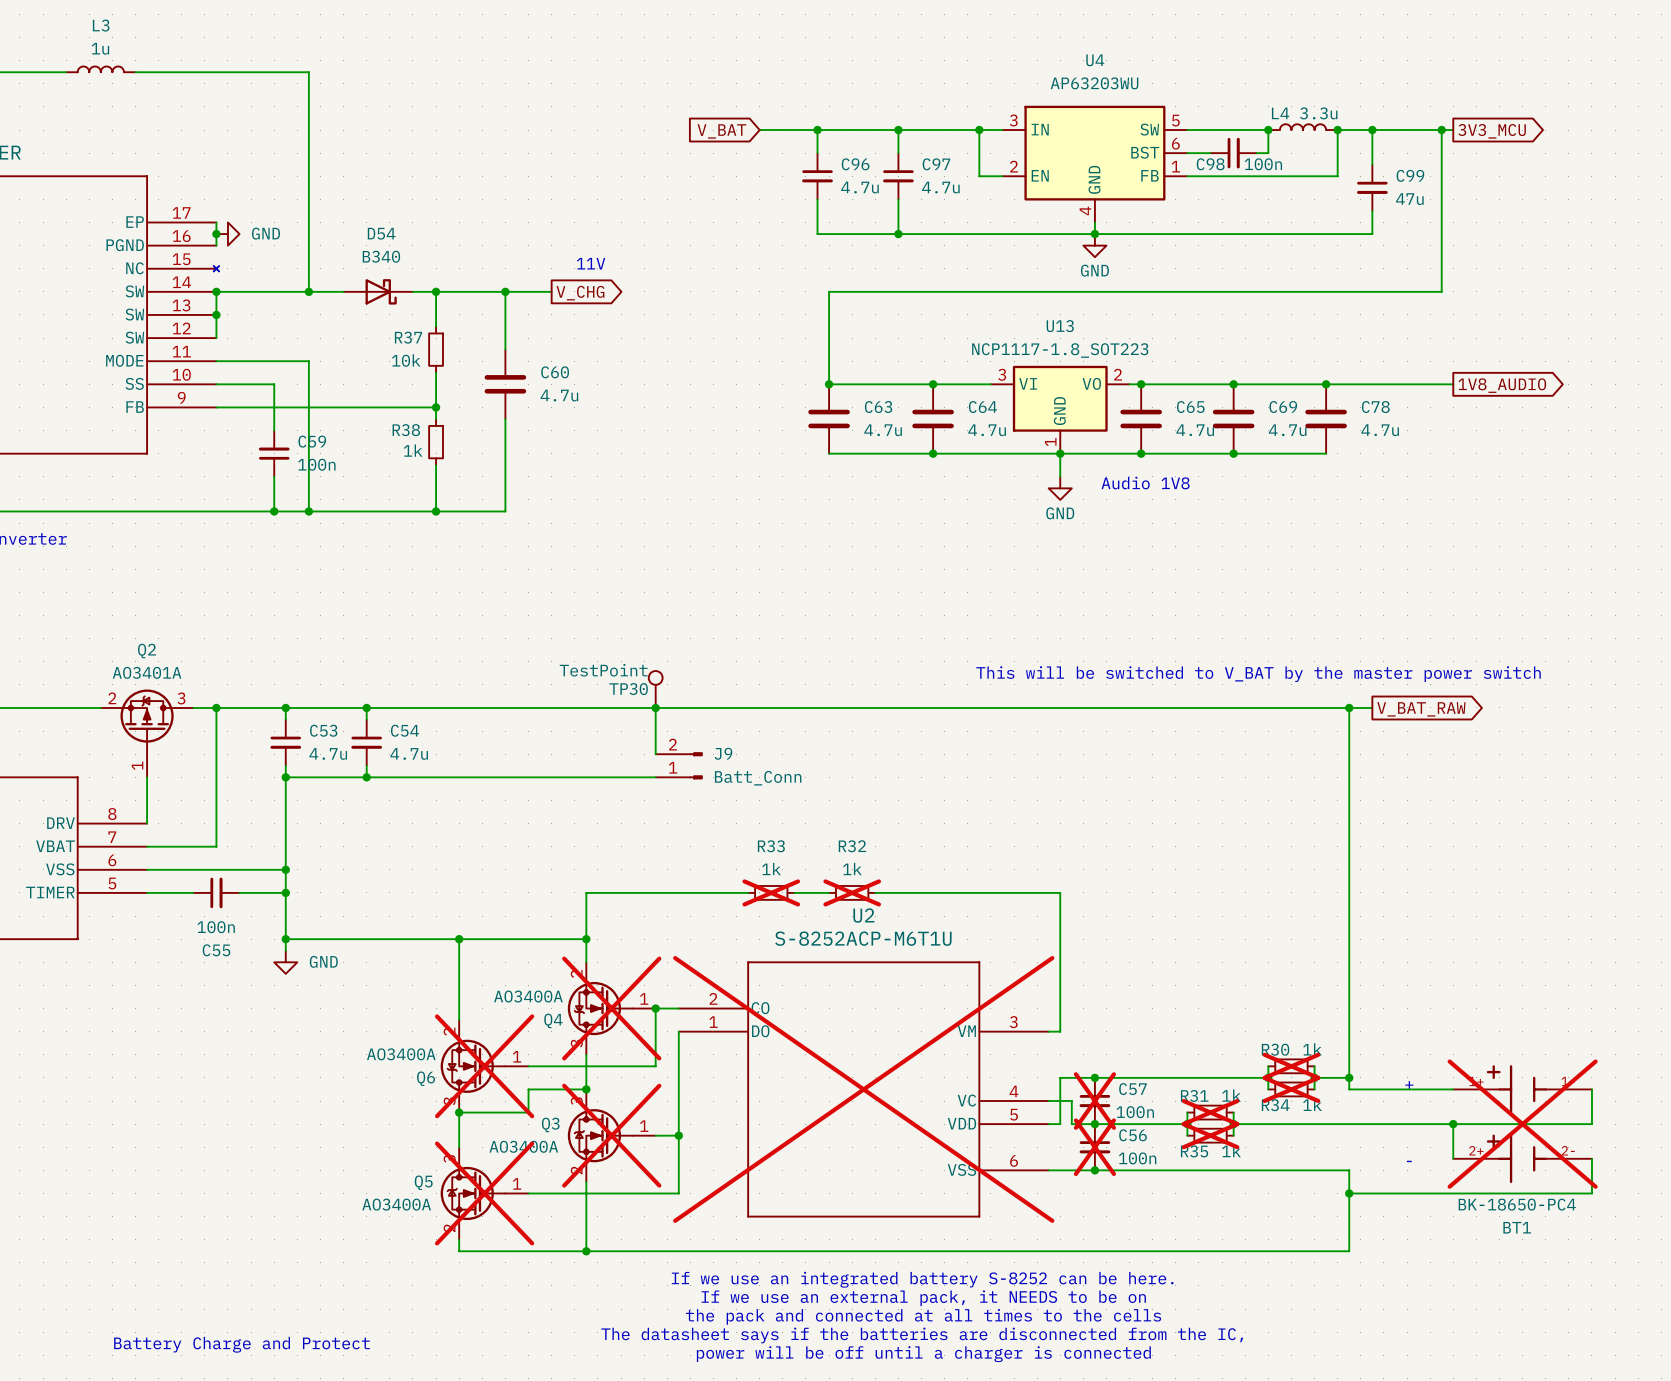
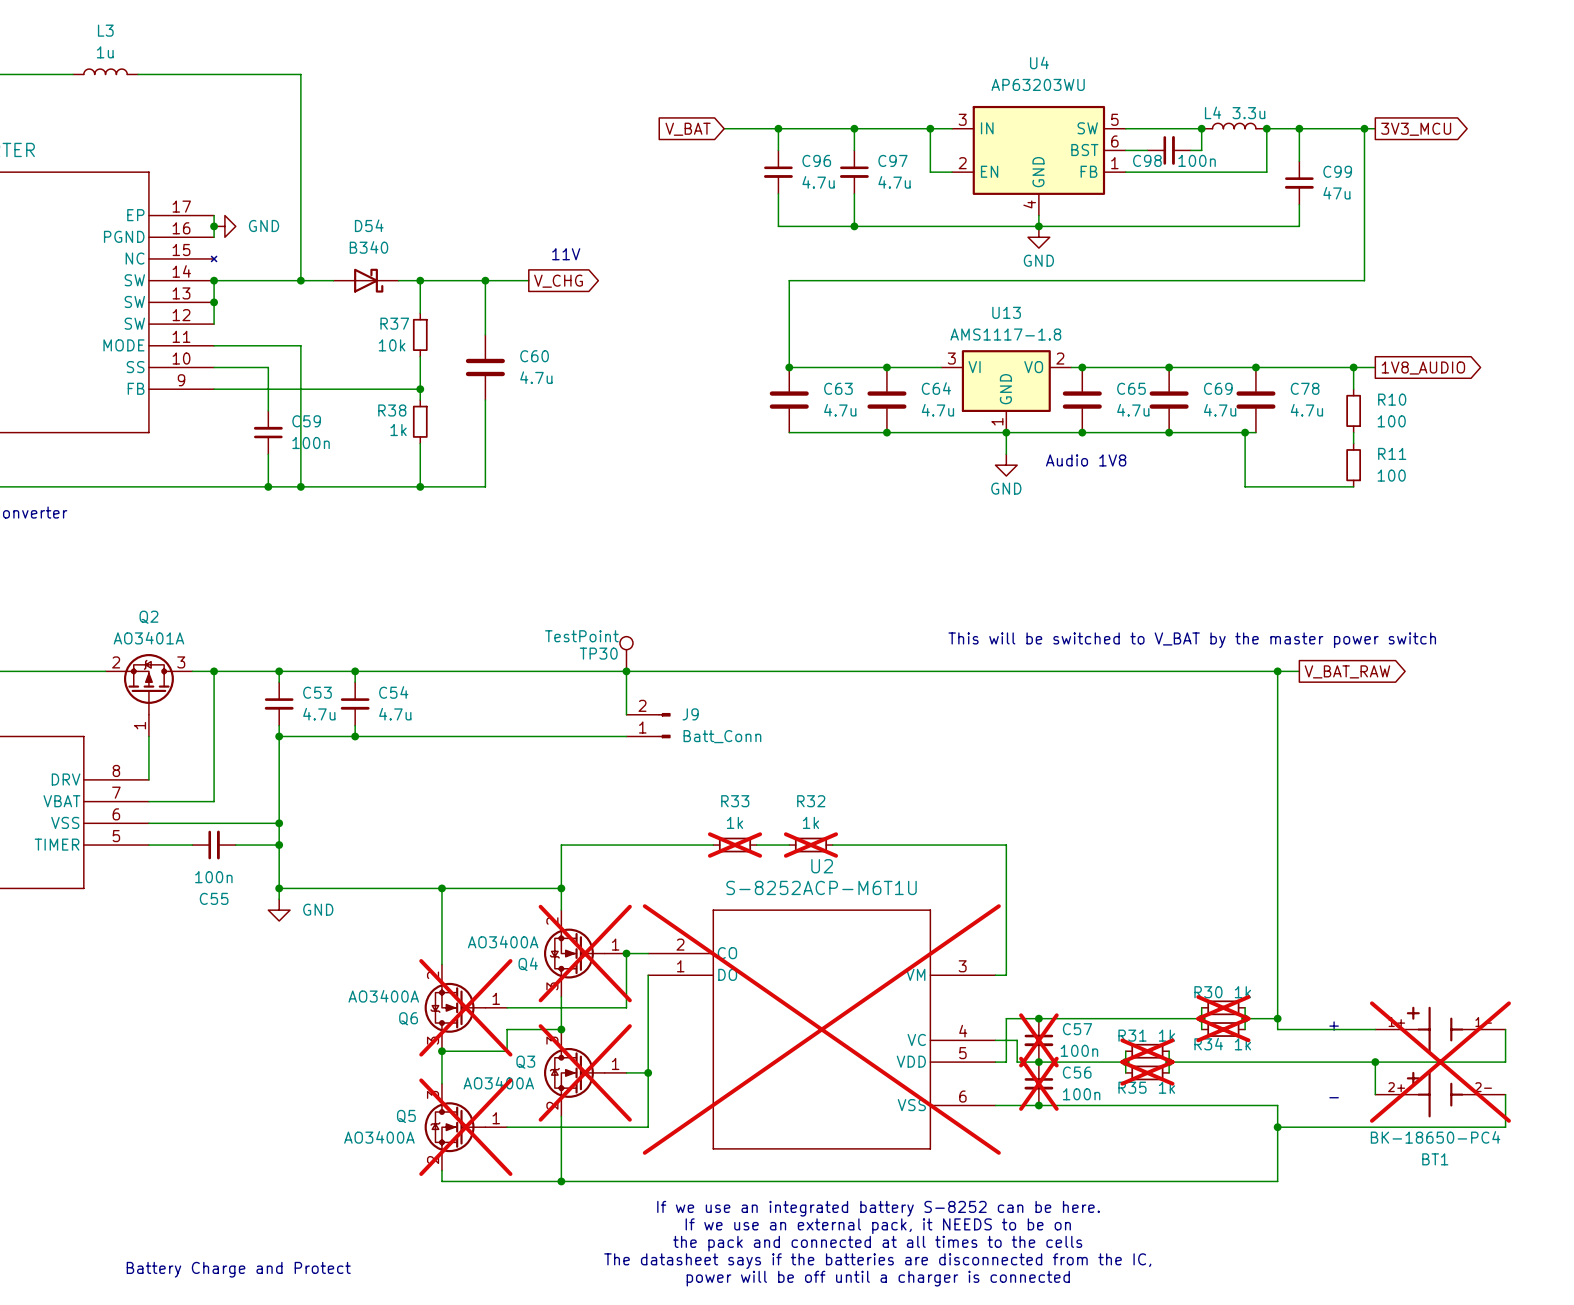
U13 value: NCP1117-1.8_SOT223 (1060, 350) -> AMS1117-1.8 (1005, 334)
wire: none -> (1353, 367) (1353, 389)
junction: none -> (1353, 367)
R10: none -> 100 (1353, 410)
wire: none -> (1245, 432) (1245, 486) (1353, 486)
junction: none -> (1245, 432)
wire: none -> (1353, 432) (1353, 443)
R11: none -> 100 (1353, 465)

